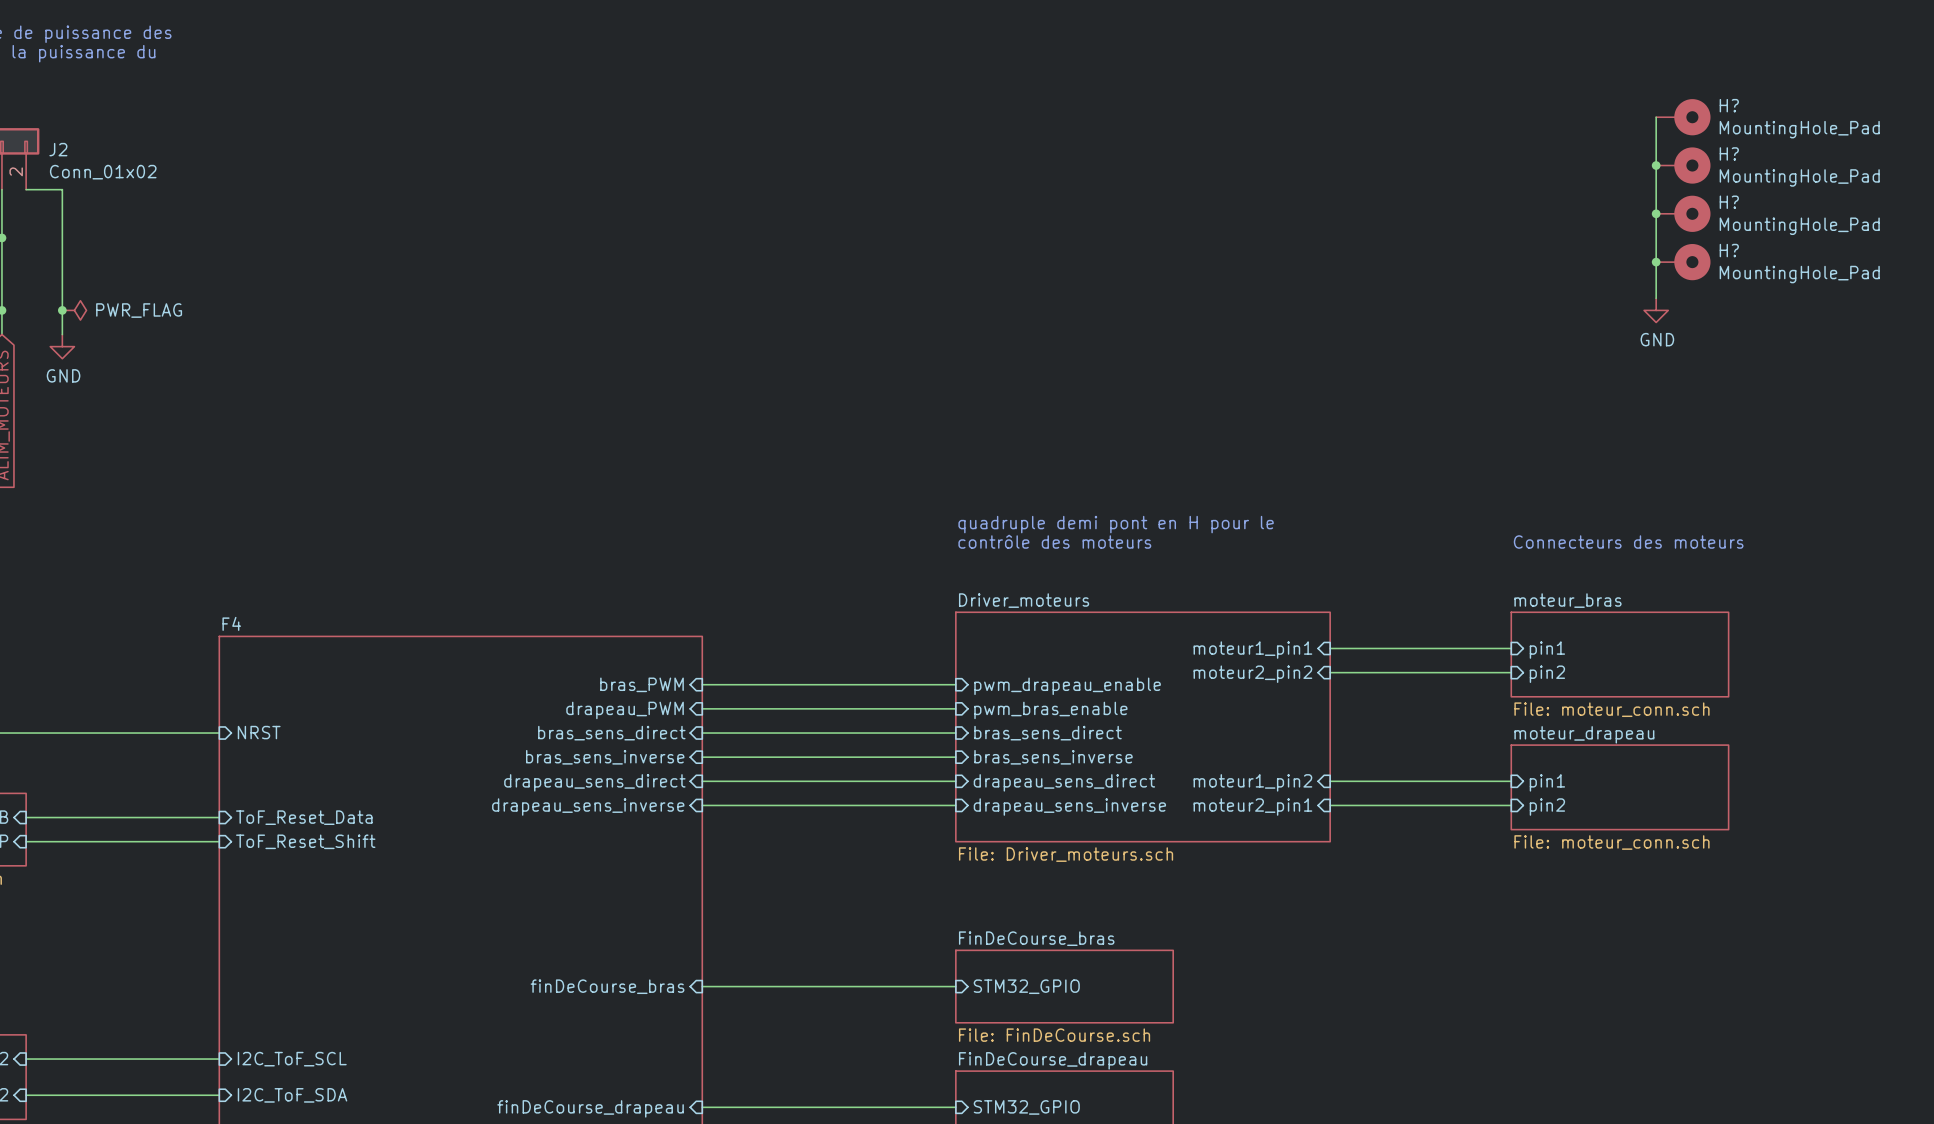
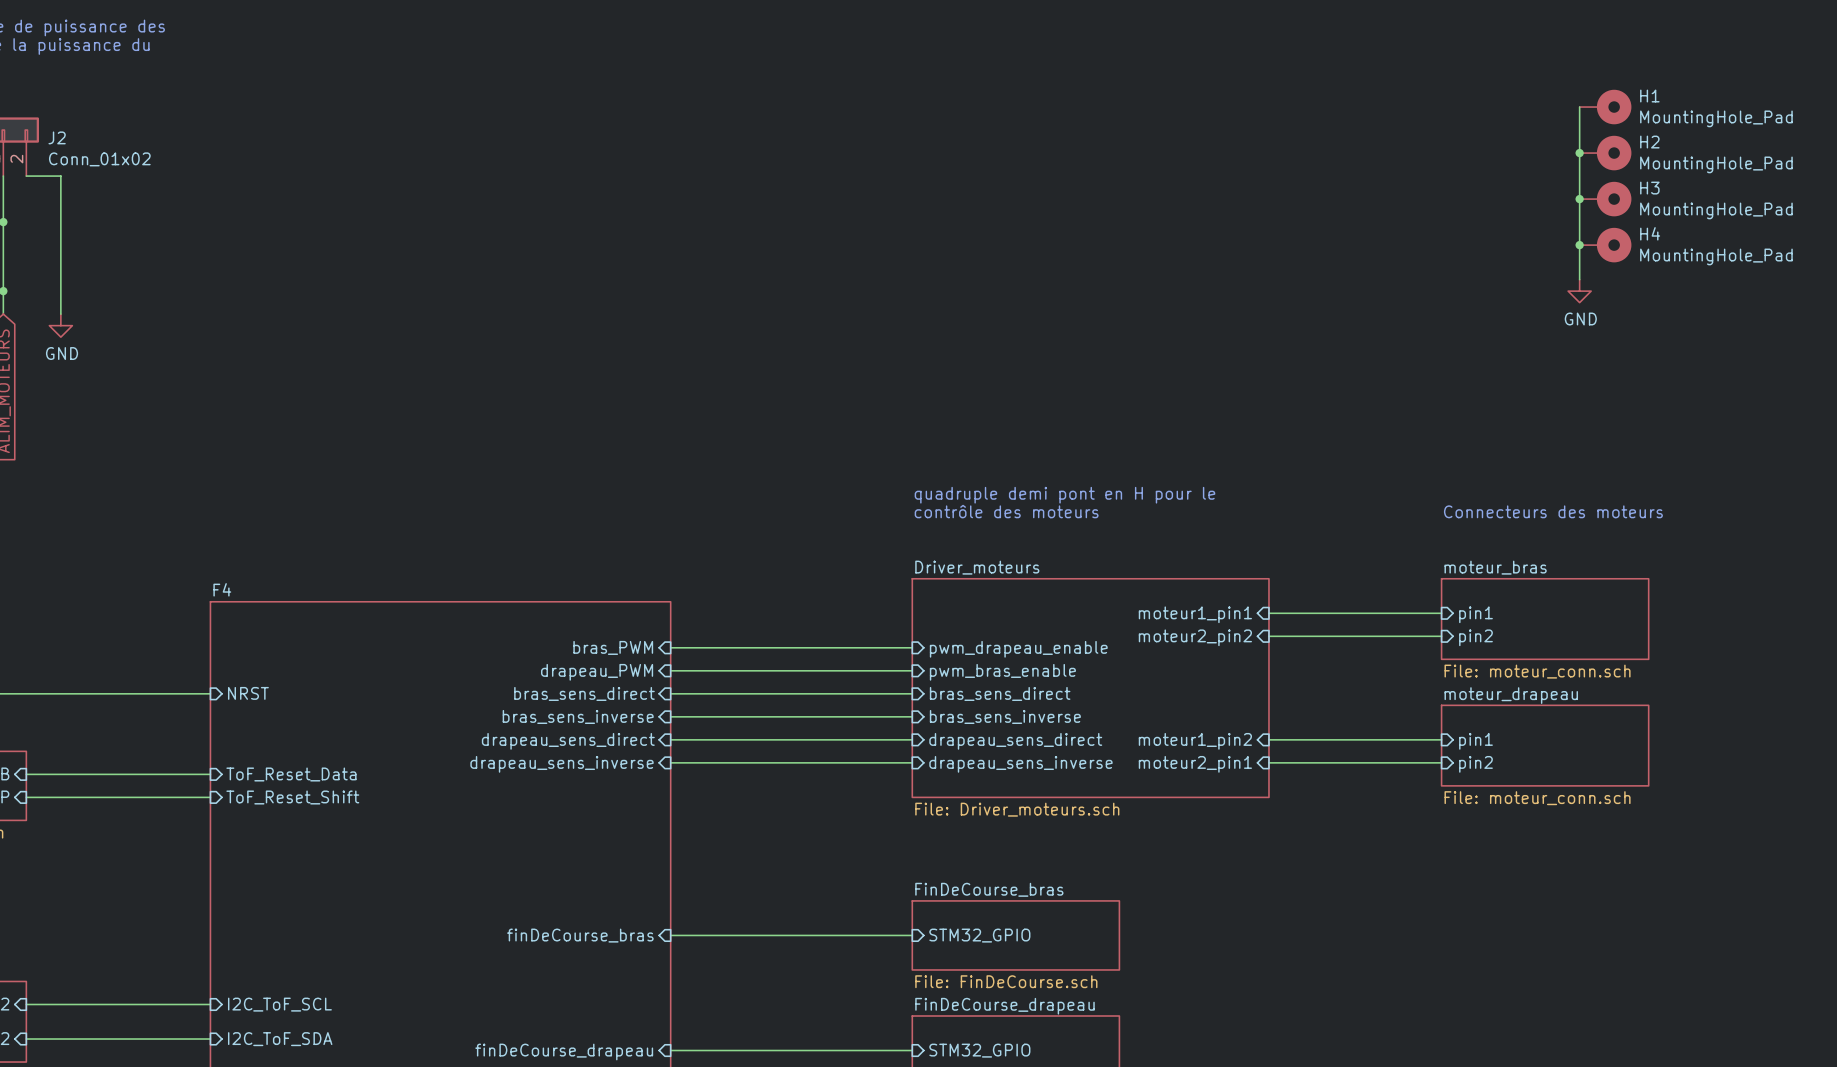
H? name: H? (1729, 105) -> H1 (1649, 96)
H? name: H? (1729, 153) -> H2 (1649, 142)
H? name: H? (1729, 202) -> H3 (1649, 188)
H? name: H? (1729, 250) -> H4 (1650, 233)
junction: (62, 310) -> none
power symbol: PWR_FLAG (74, 310) -> none

